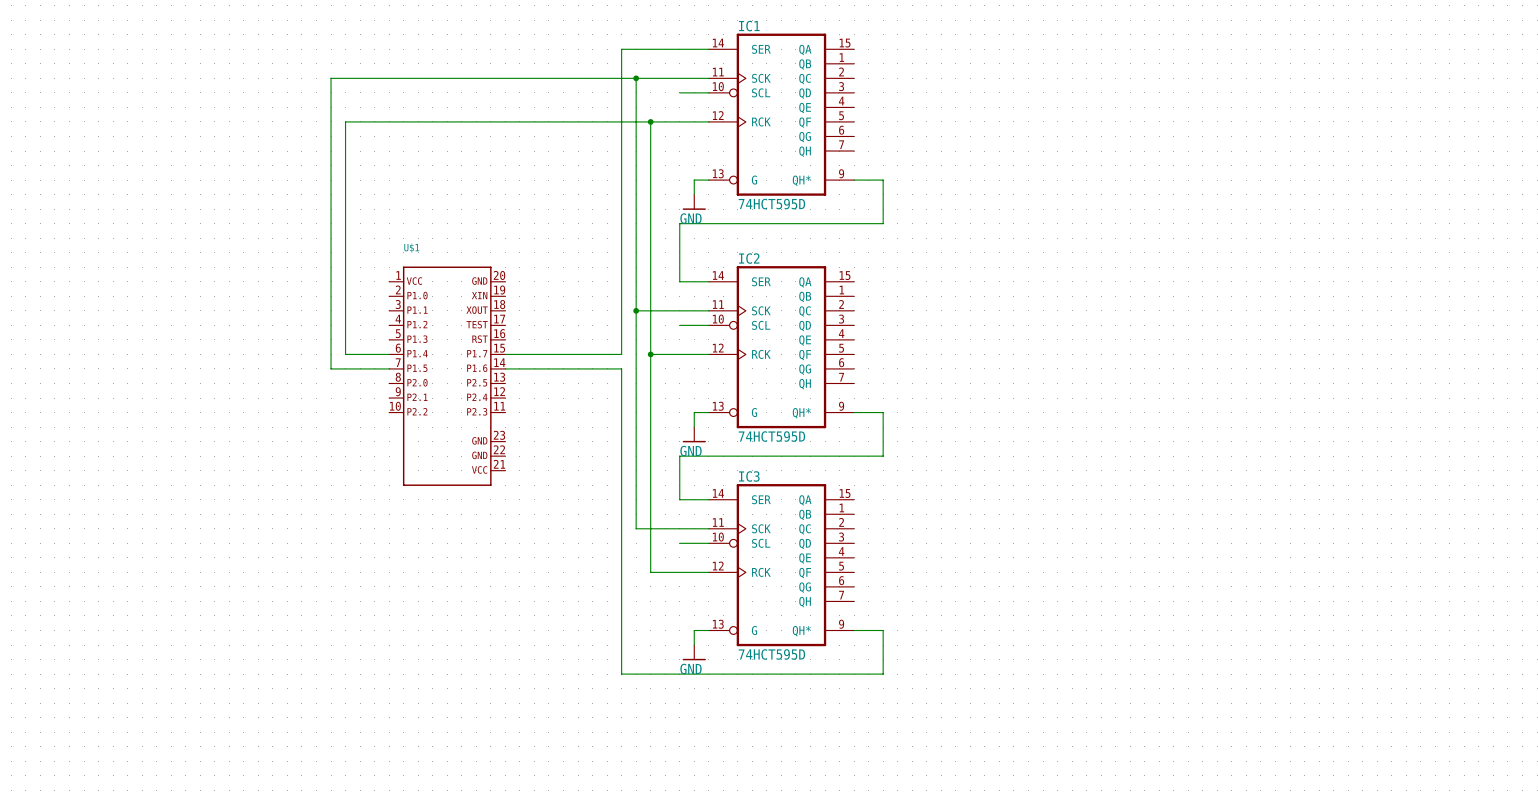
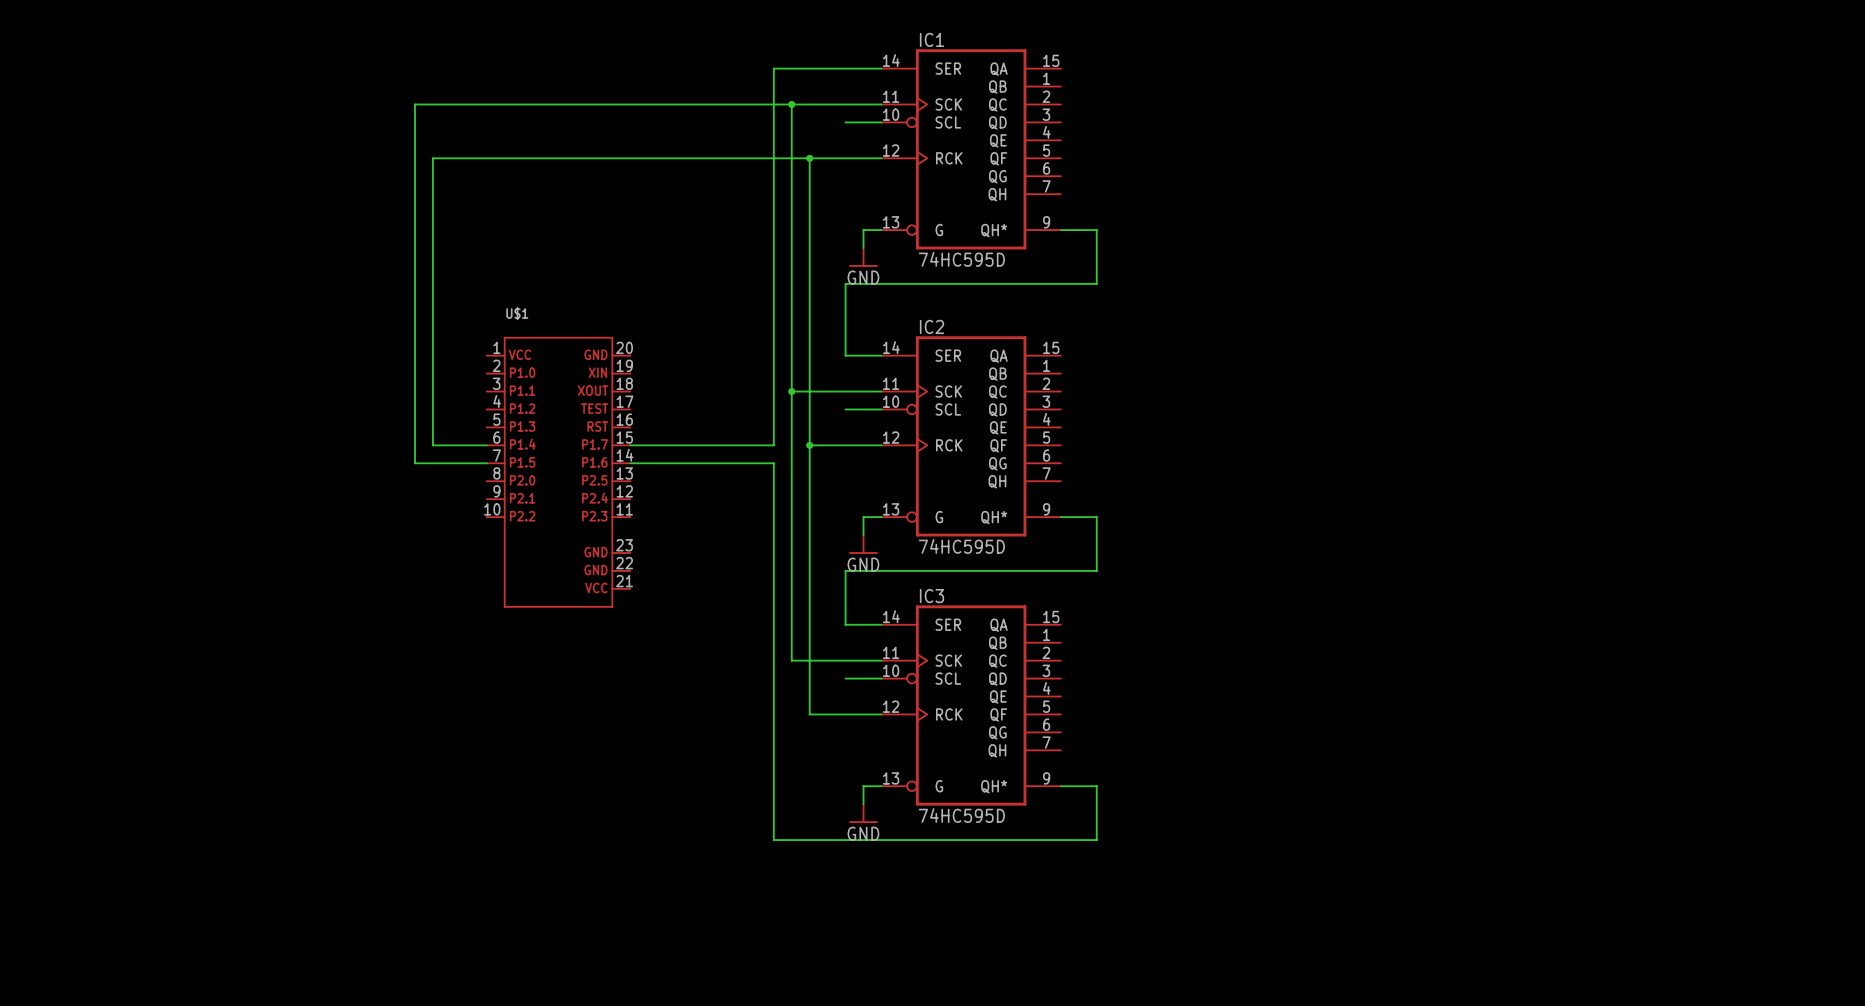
IC1 value: 74HCT595D (771, 204) -> 74HC595D (961, 259)
IC2 value: 74HCT595D (771, 436) -> 74HC595D (961, 546)
IC3 value: 74HCT595D (771, 654) -> 74HC595D (961, 815)

